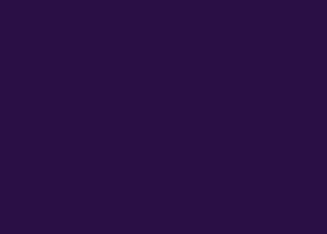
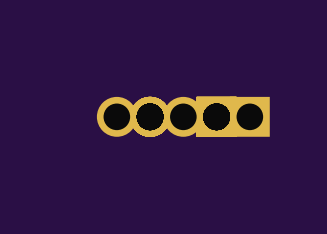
part: none -> (183, 116)
part: none -> (183, 116)

